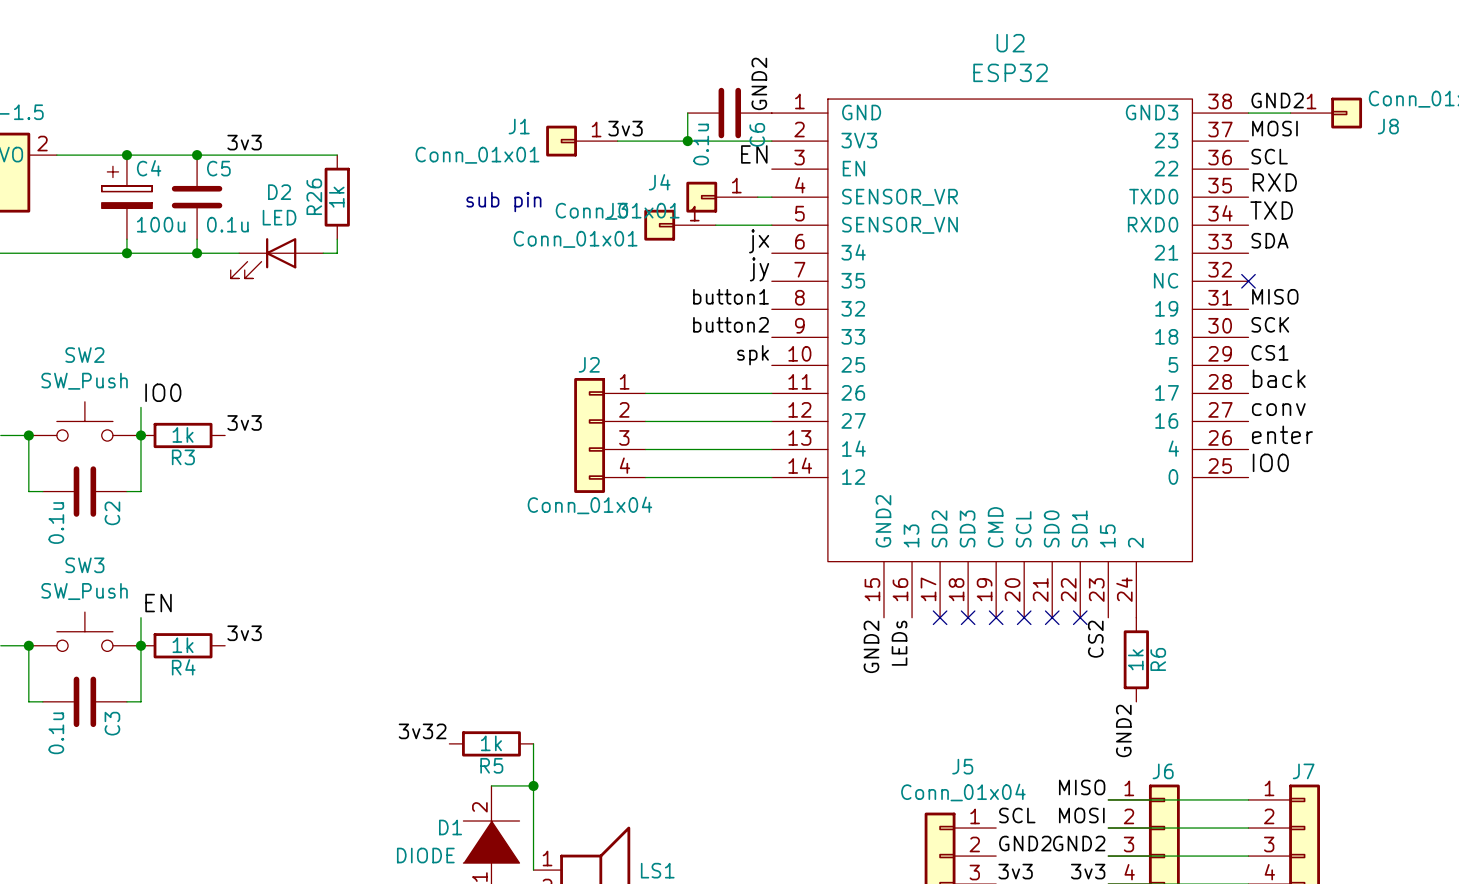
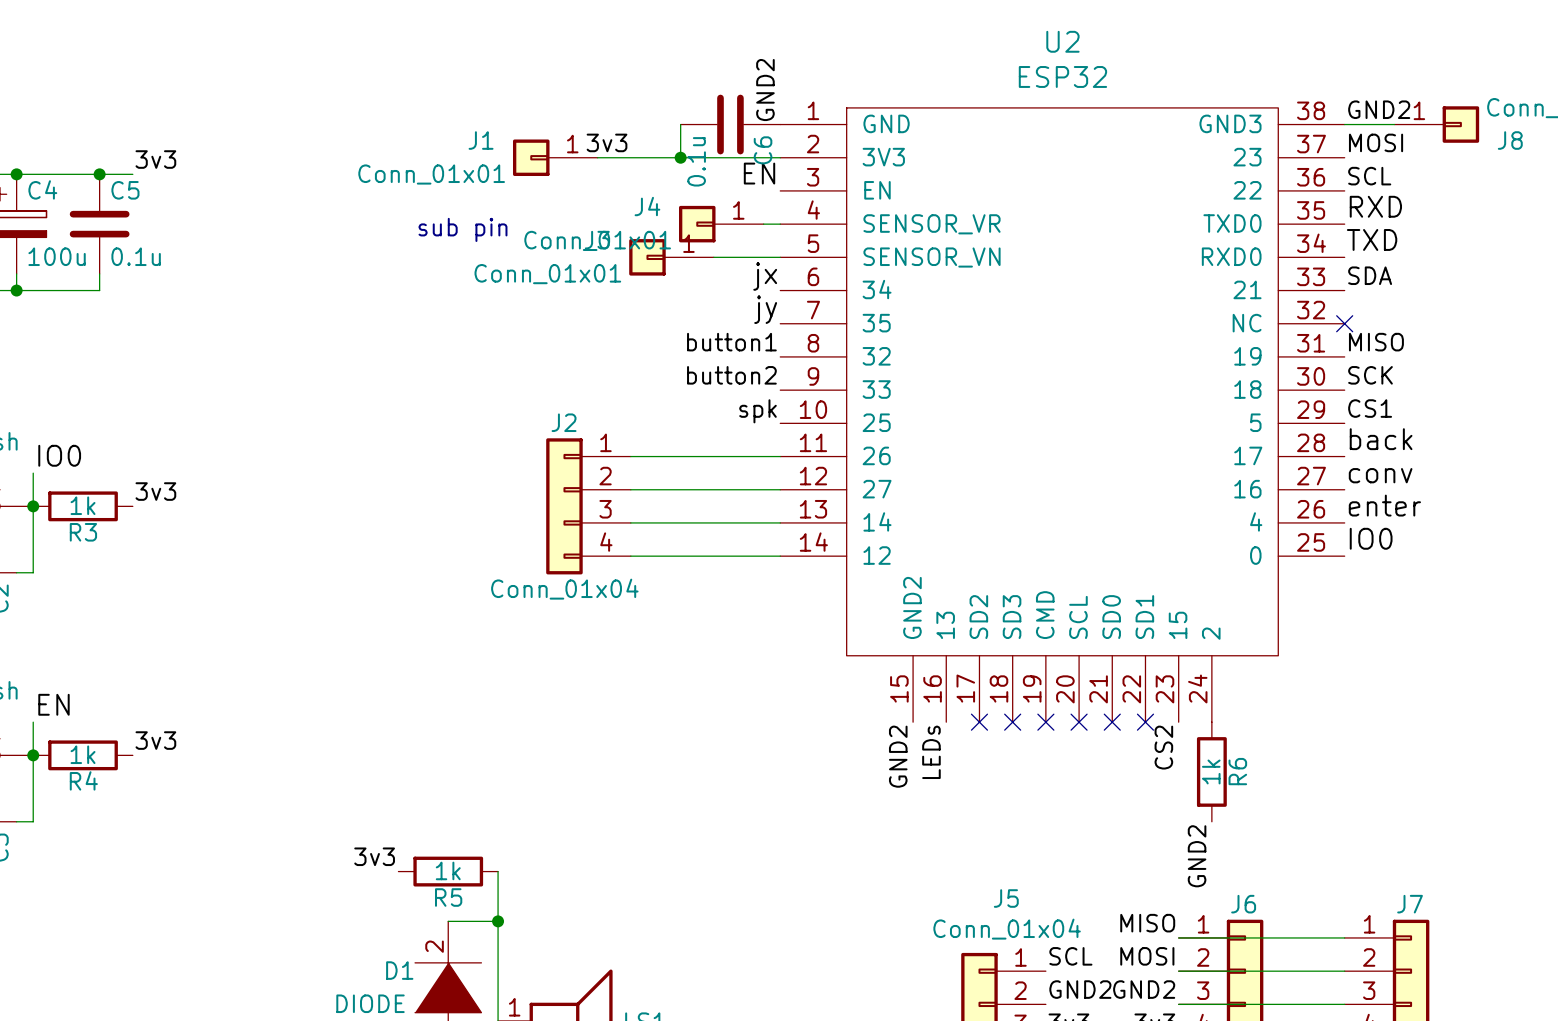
wire: (225, 155) (337, 155) -> none
R26: 1k (337, 197) -> none
wire: (337, 239) (337, 253) (323, 253) -> none
wire: (197, 253) (239, 253) -> none
junction: (197, 253) -> none
D2: LED (276, 258) -> none
label: 3v32 (422, 731) -> 3v3 (374, 856)

